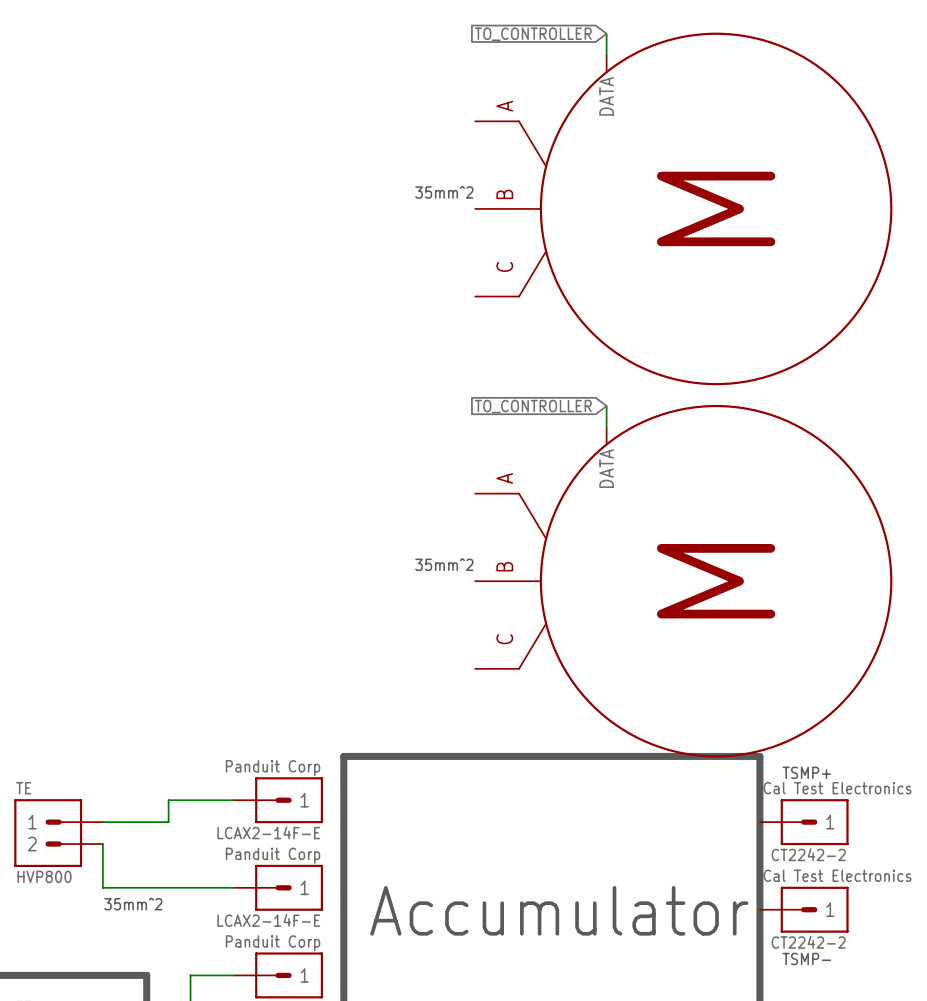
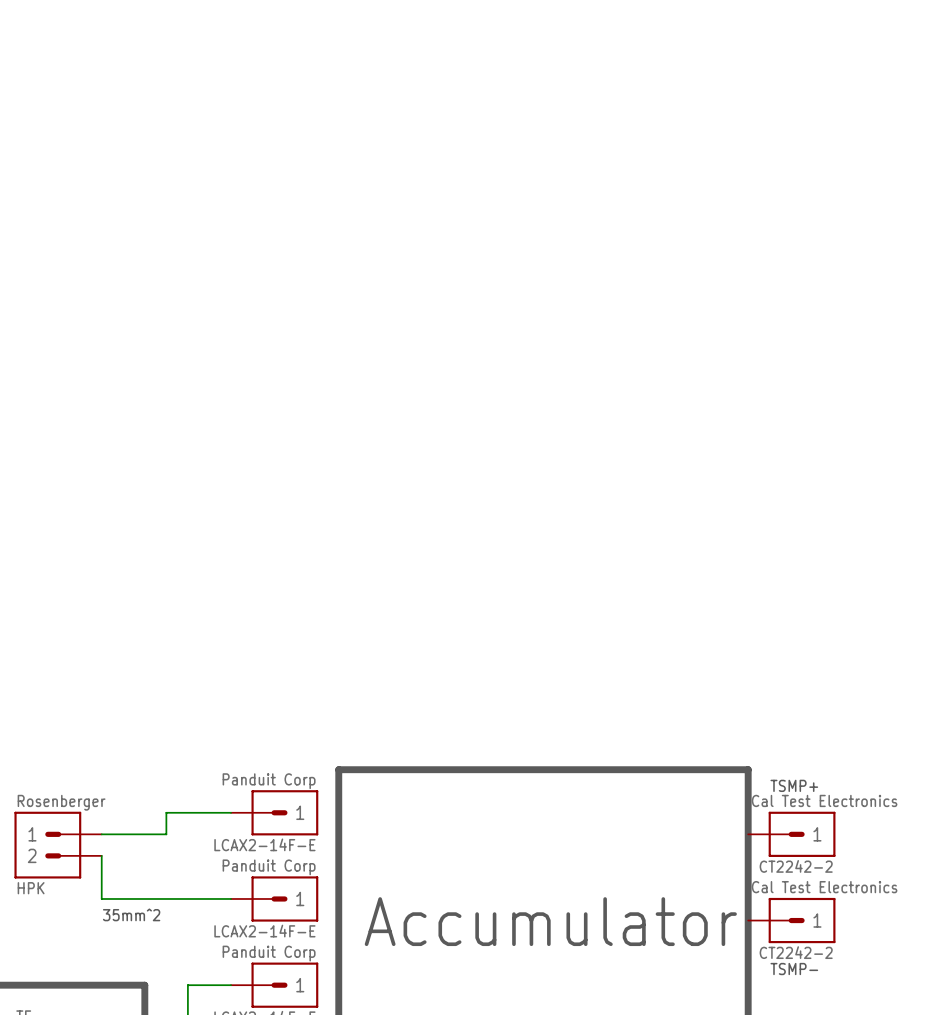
wire: (606, 33) (606, 55) -> none
global label: TO_CONTROLLER (533, 34) -> none
text: 35mm^2 (444, 192) -> none
part: (683, 208) -> none
global label: TO_CONTROLLER (533, 406) -> none
wire: (606, 406) (606, 427) -> none
text: 35mm^2 (444, 564) -> none
part: (683, 581) -> none
part text: TE (23, 788) -> Rosenberger (61, 802)
part text: HVP800 (44, 876) -> HPK (31, 888)

